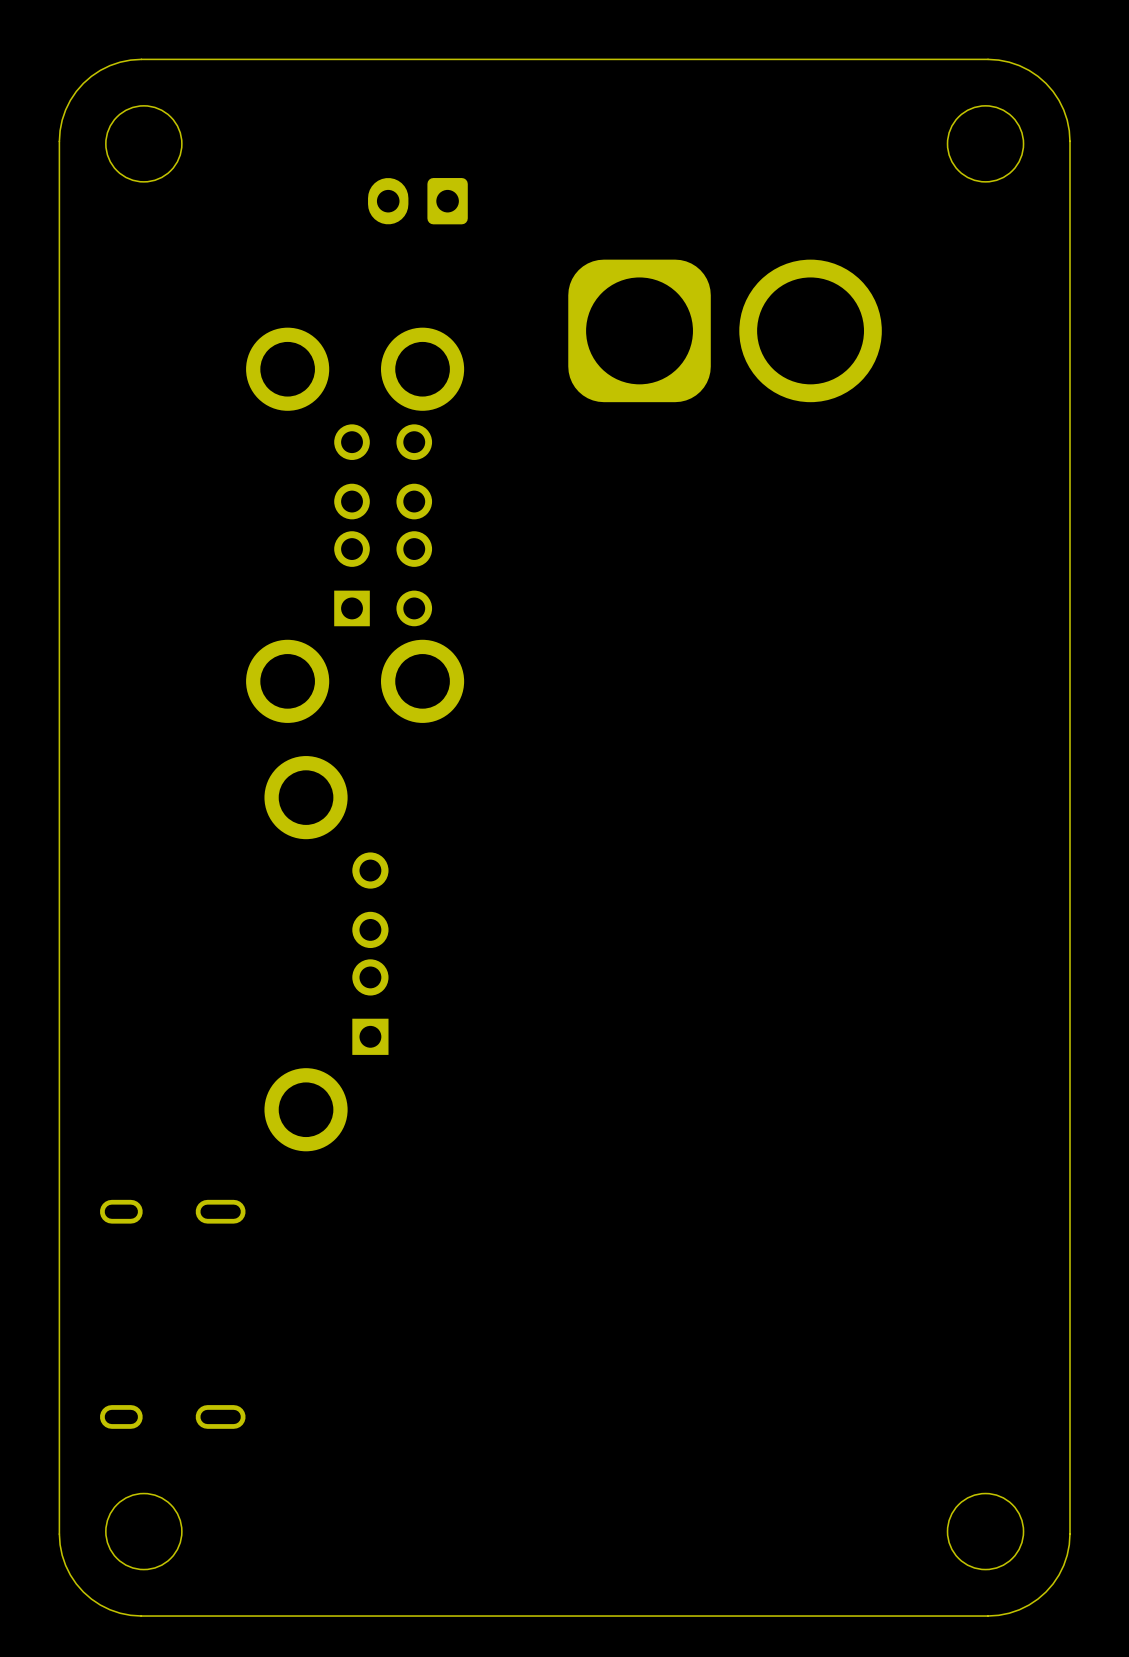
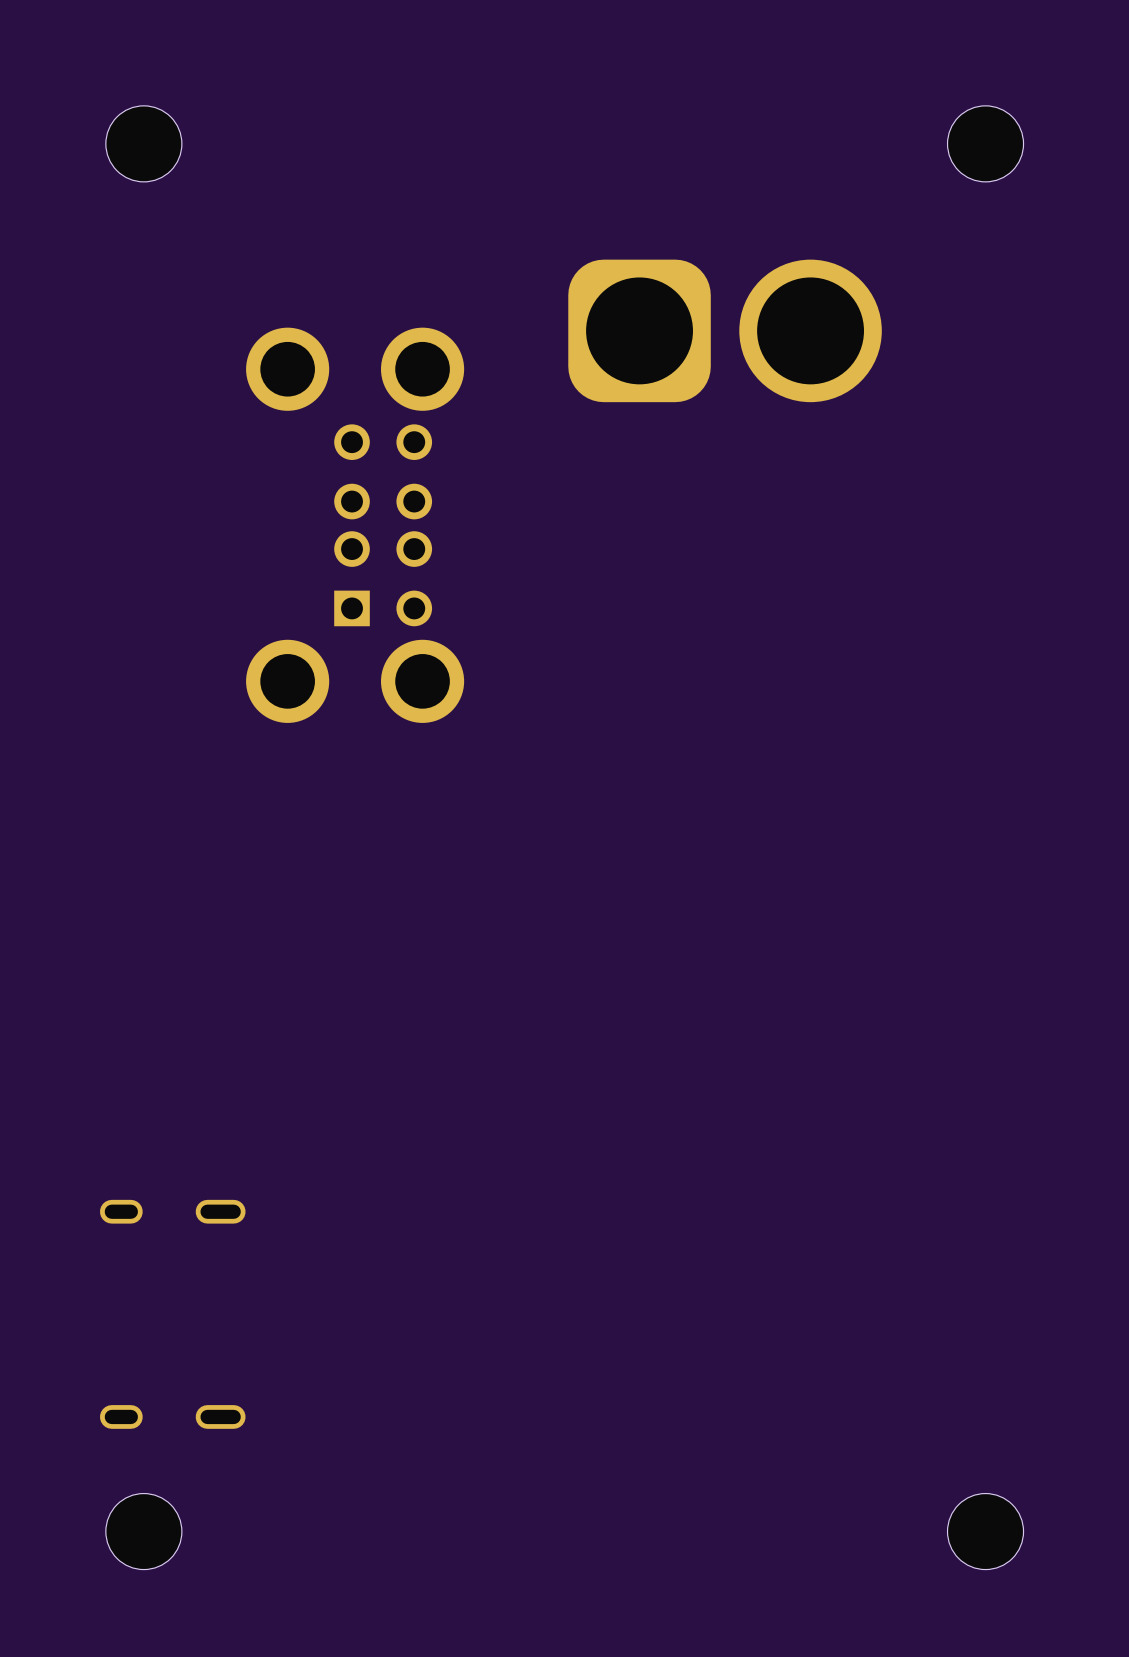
board edge: (988, 59) (141, 59) (120, 62) (100, 70) (83, 83) (70, 100) (62, 120) (59, 141) (59, 1534) (62, 1555) (70, 1575) (83, 1592) (100, 1605) (120, 1613) (141, 1616) (988, 1616) (1009, 1613) (1029, 1605) (1045, 1592) (1059, 1575) (1067, 1555) (1069, 1534) (1069, 141) (1063, 109) (1045, 83) (1019, 65) (988, 59) -> none
part: (417, 201) -> none
part: (326, 953) -> none

